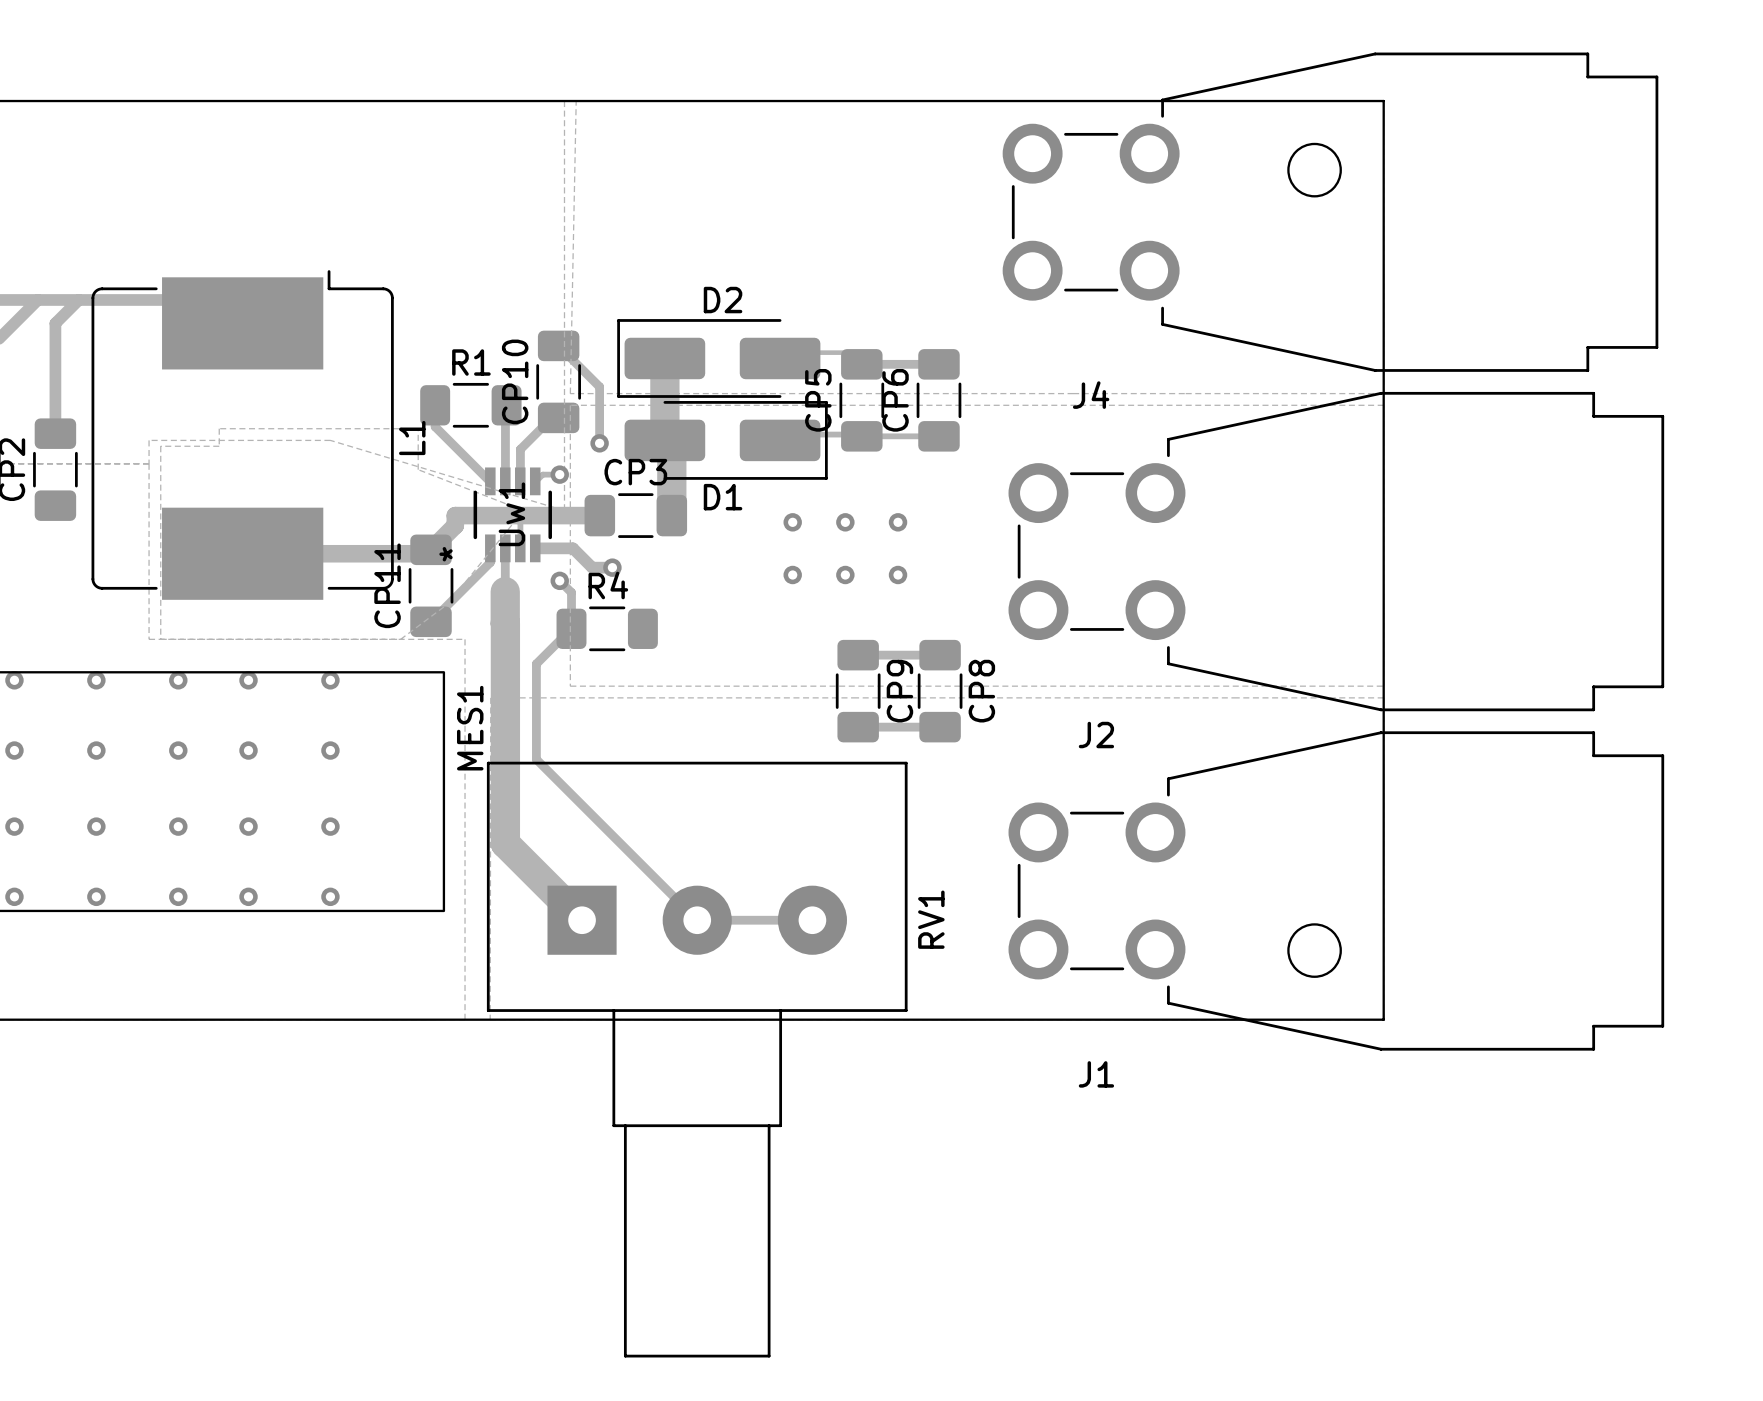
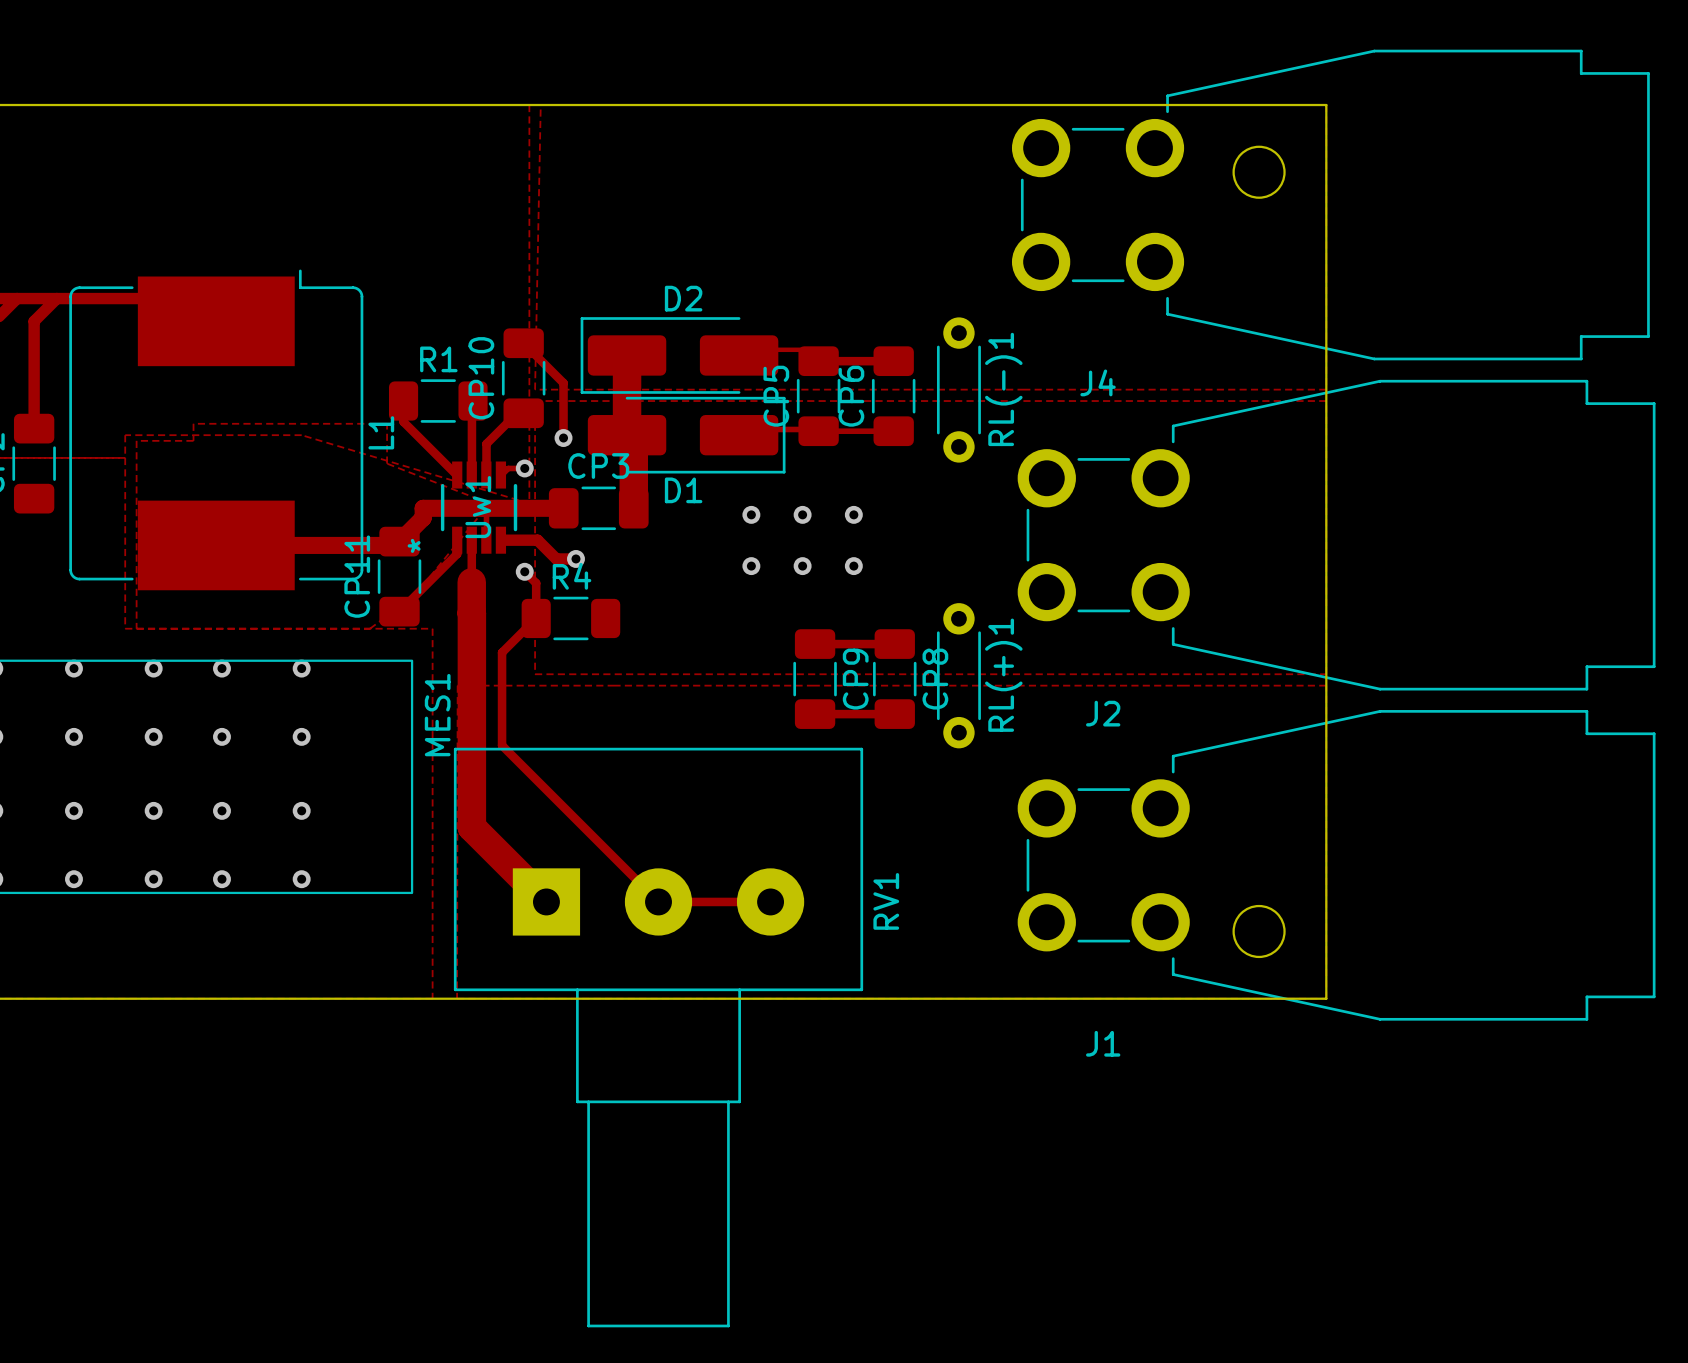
J4 position: (1330, 212) -> (1330, 205)
RL(-)1: none -> (958, 389)
J2 position: (1336, 551) -> (1336, 535)
RL(+)1: none -> (958, 675)
J1 position: (1336, 890) -> (1336, 865)

